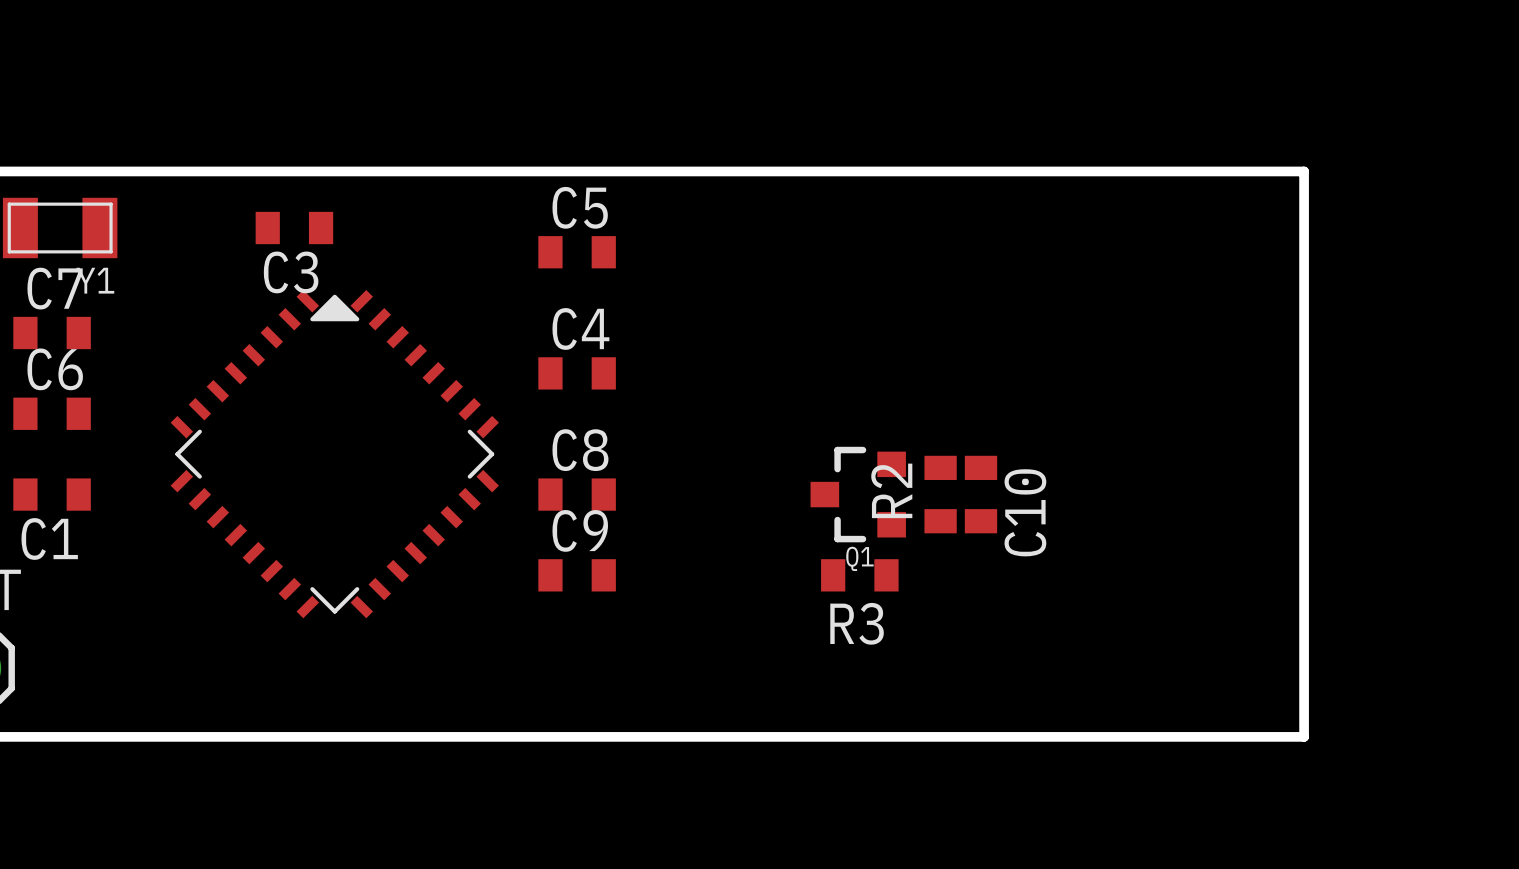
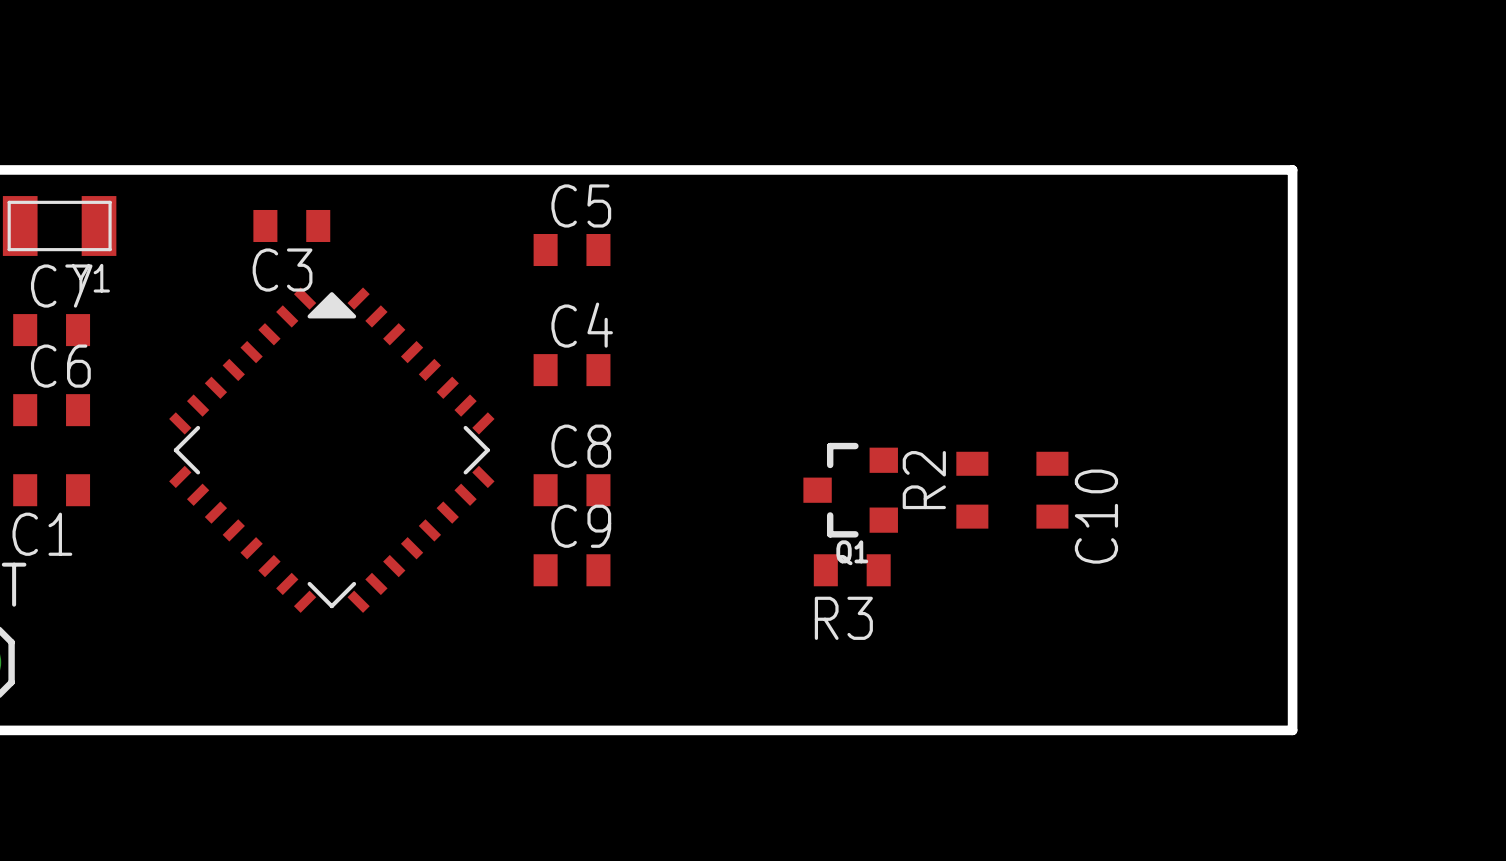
R2: (940, 494) -> none
C10: none -> (1052, 490)
C10 name: C10 (1025, 512) -> R2 (924, 480)

